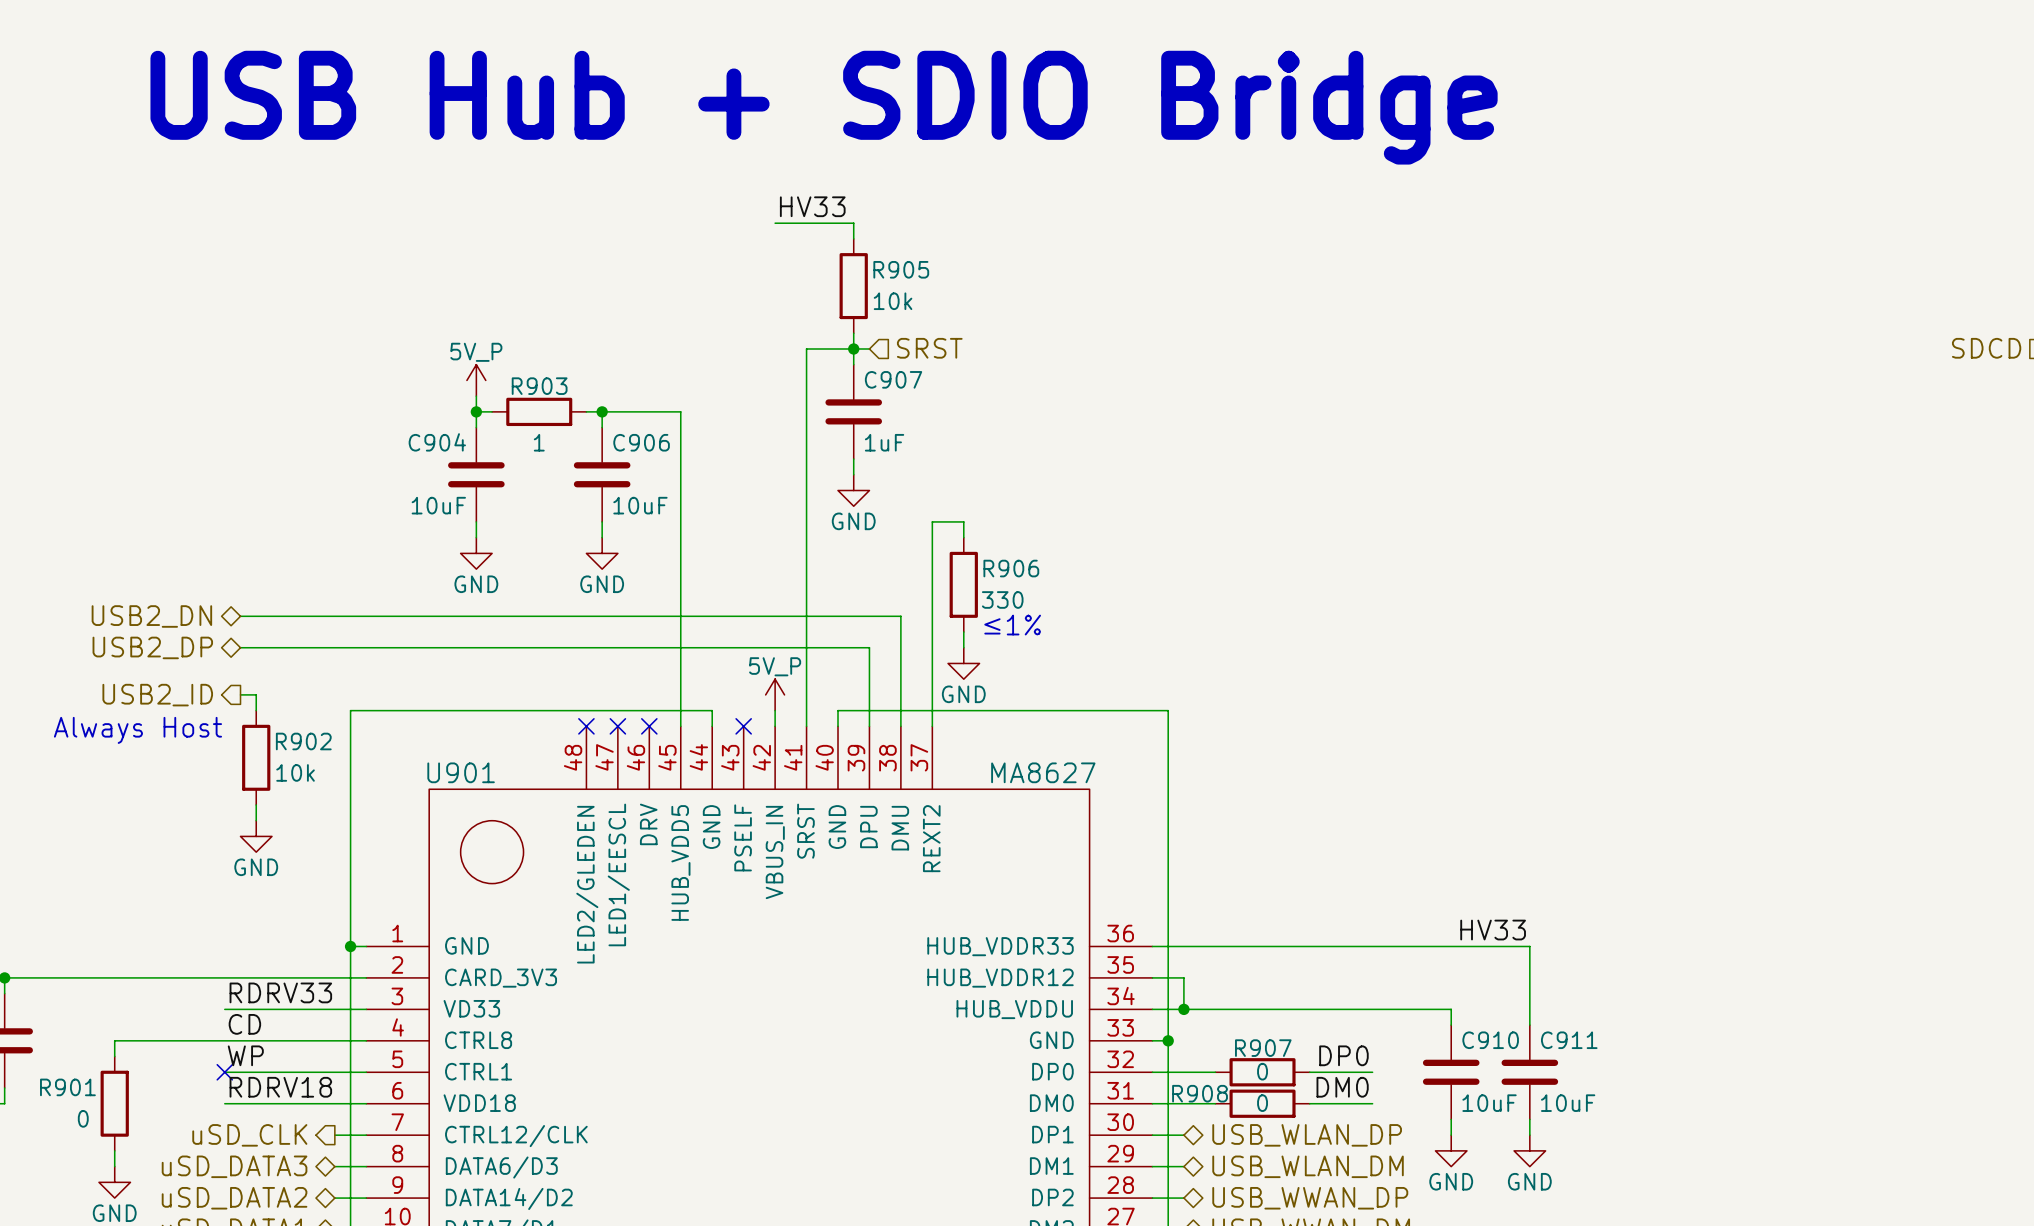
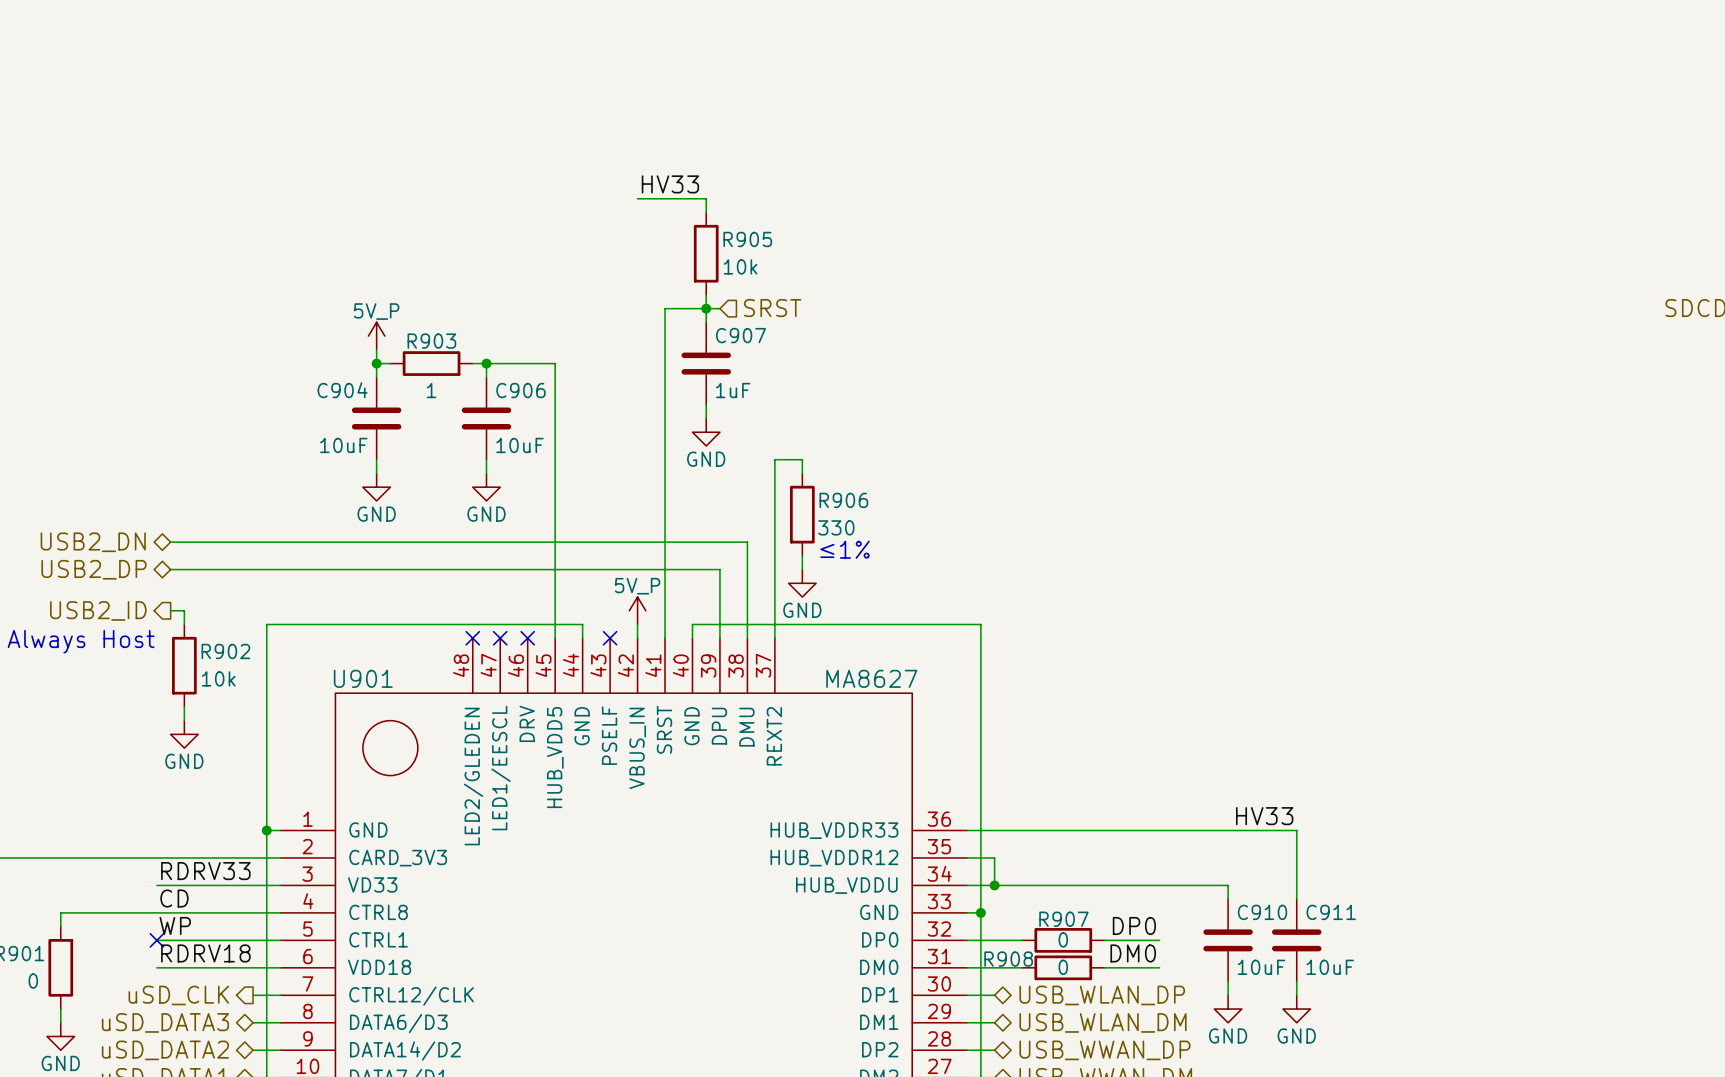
text: USB Hub + SDIO Bridge (824, 107) -> none

